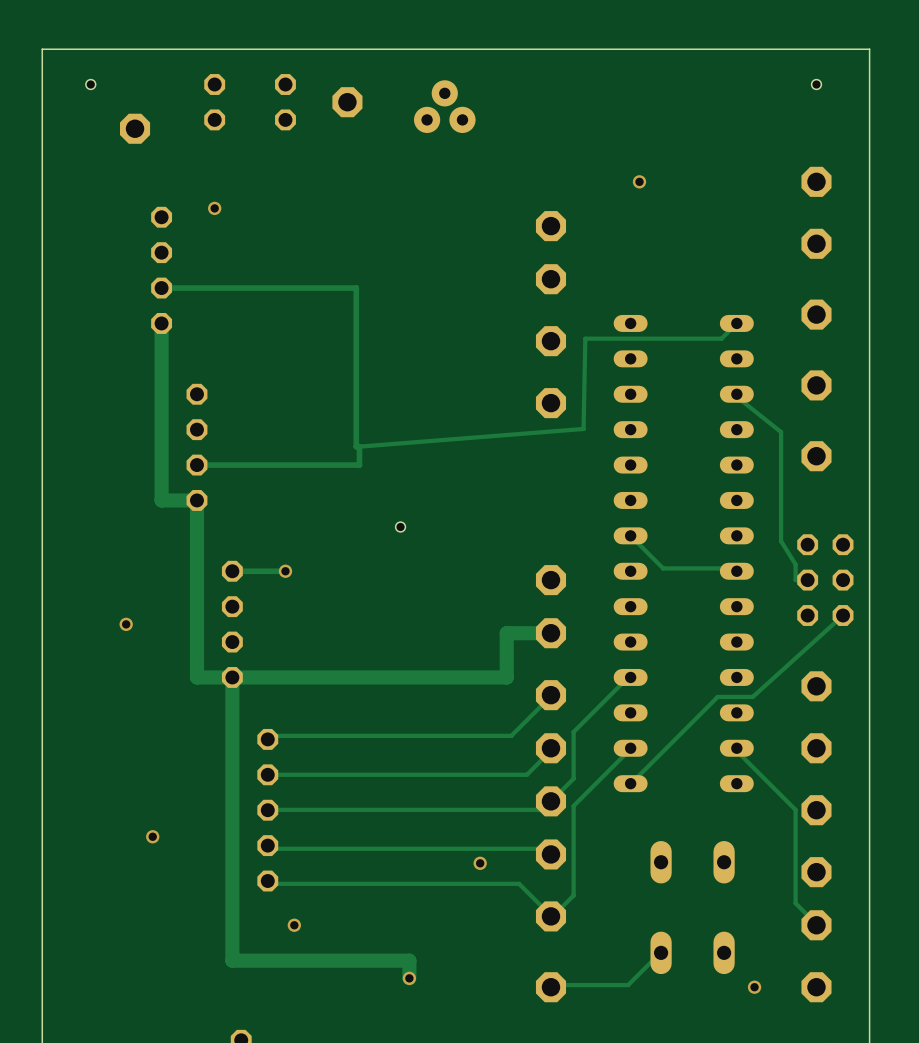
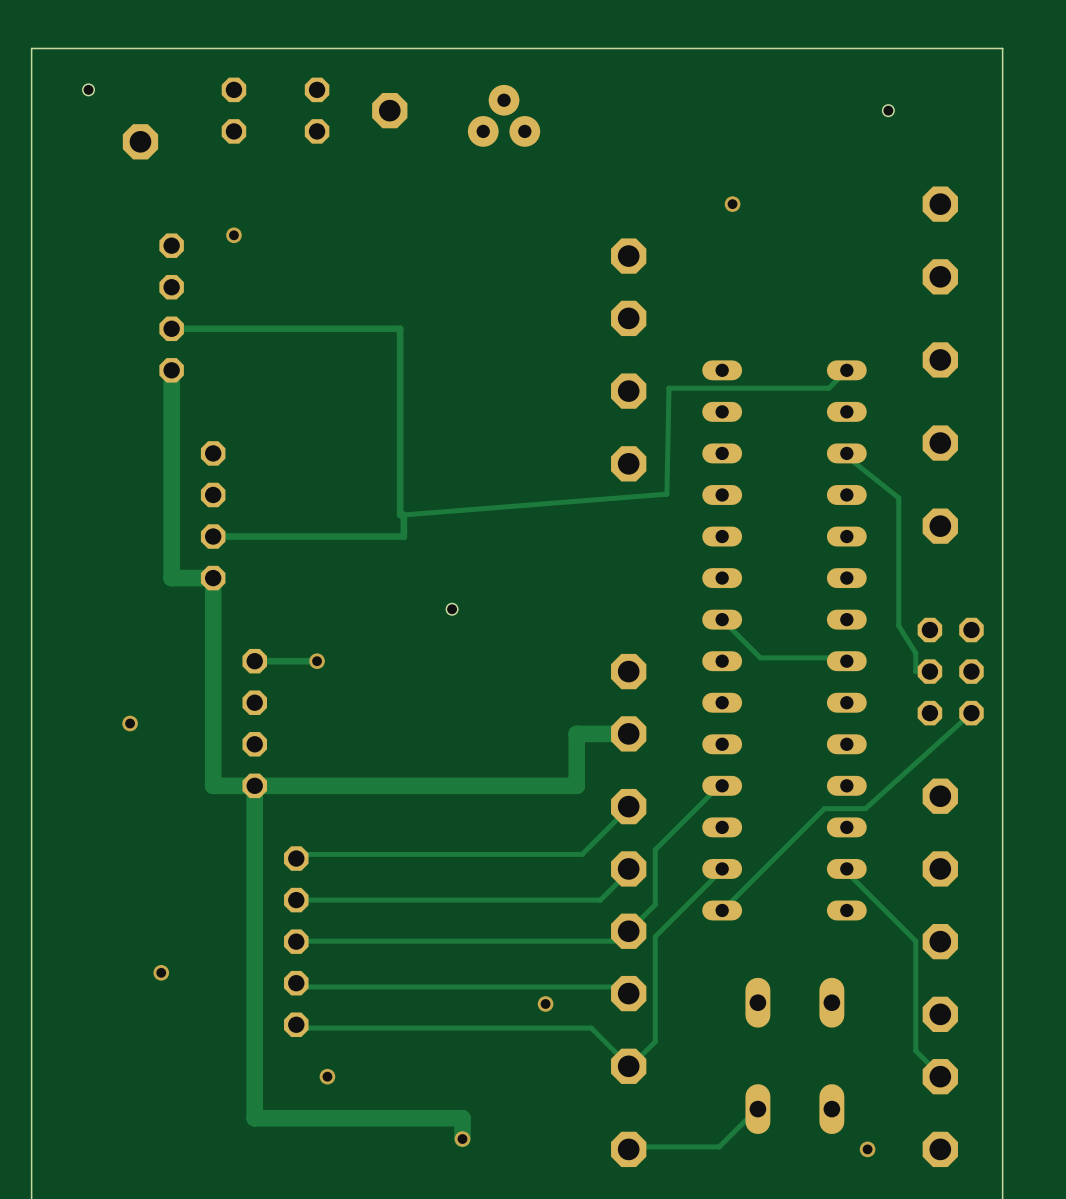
hole position: (816, 84) -> (888, 110)

